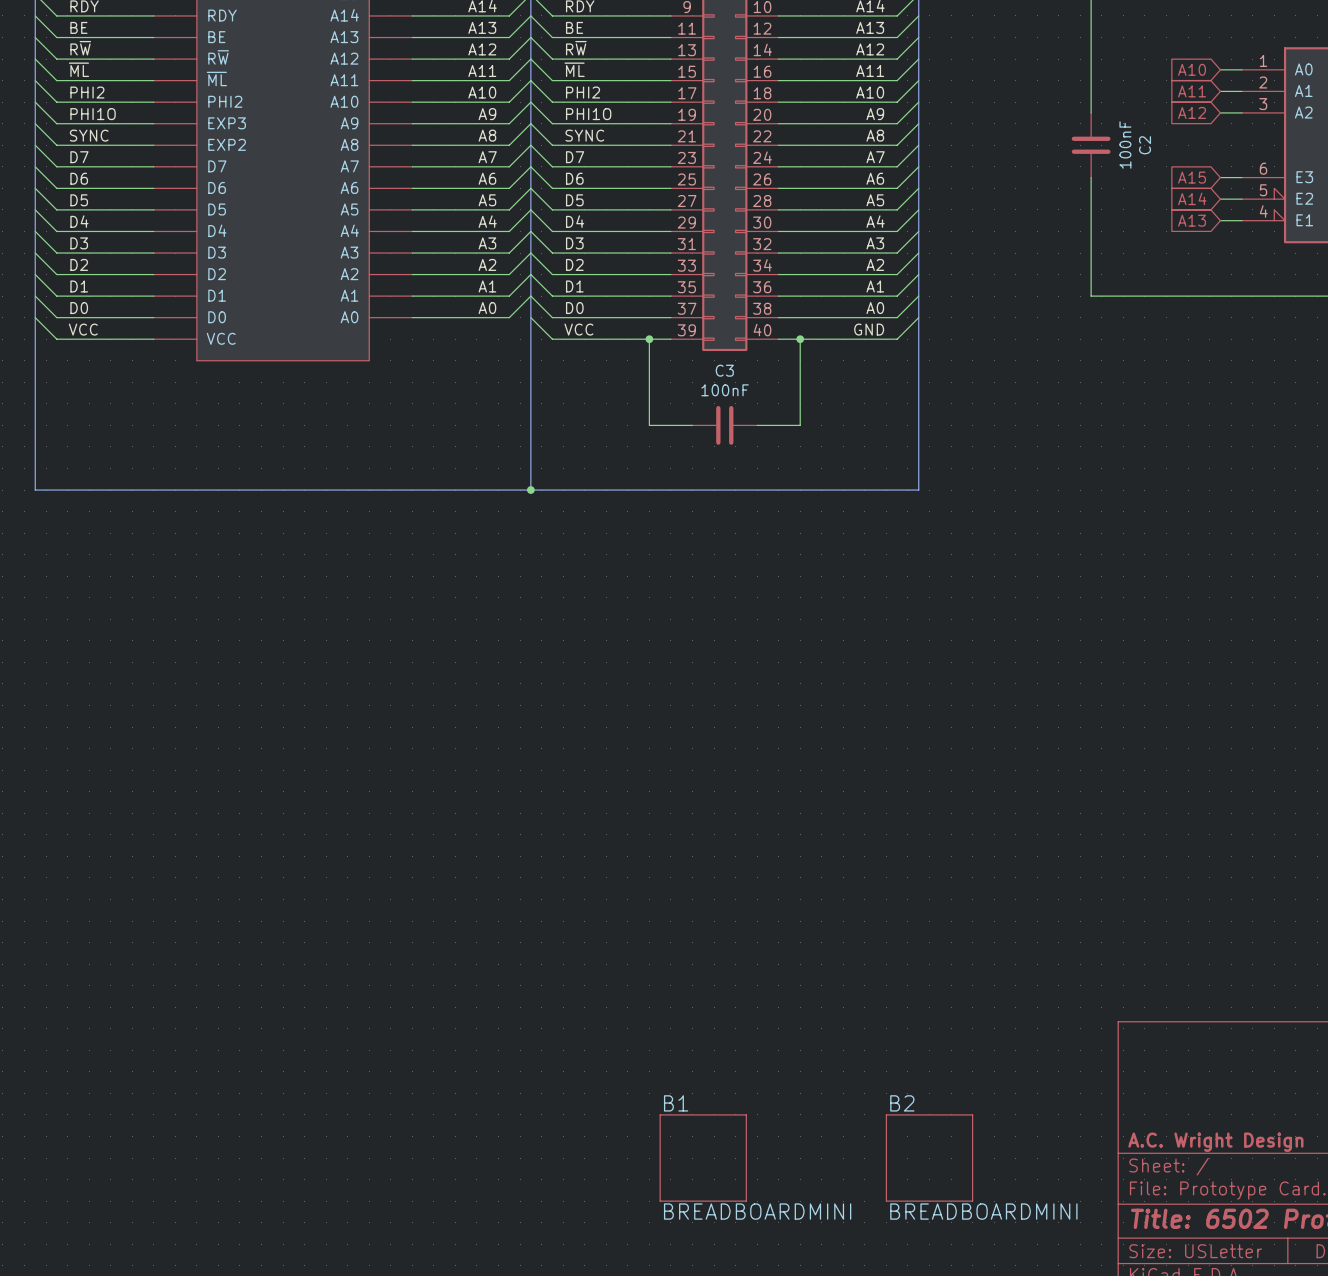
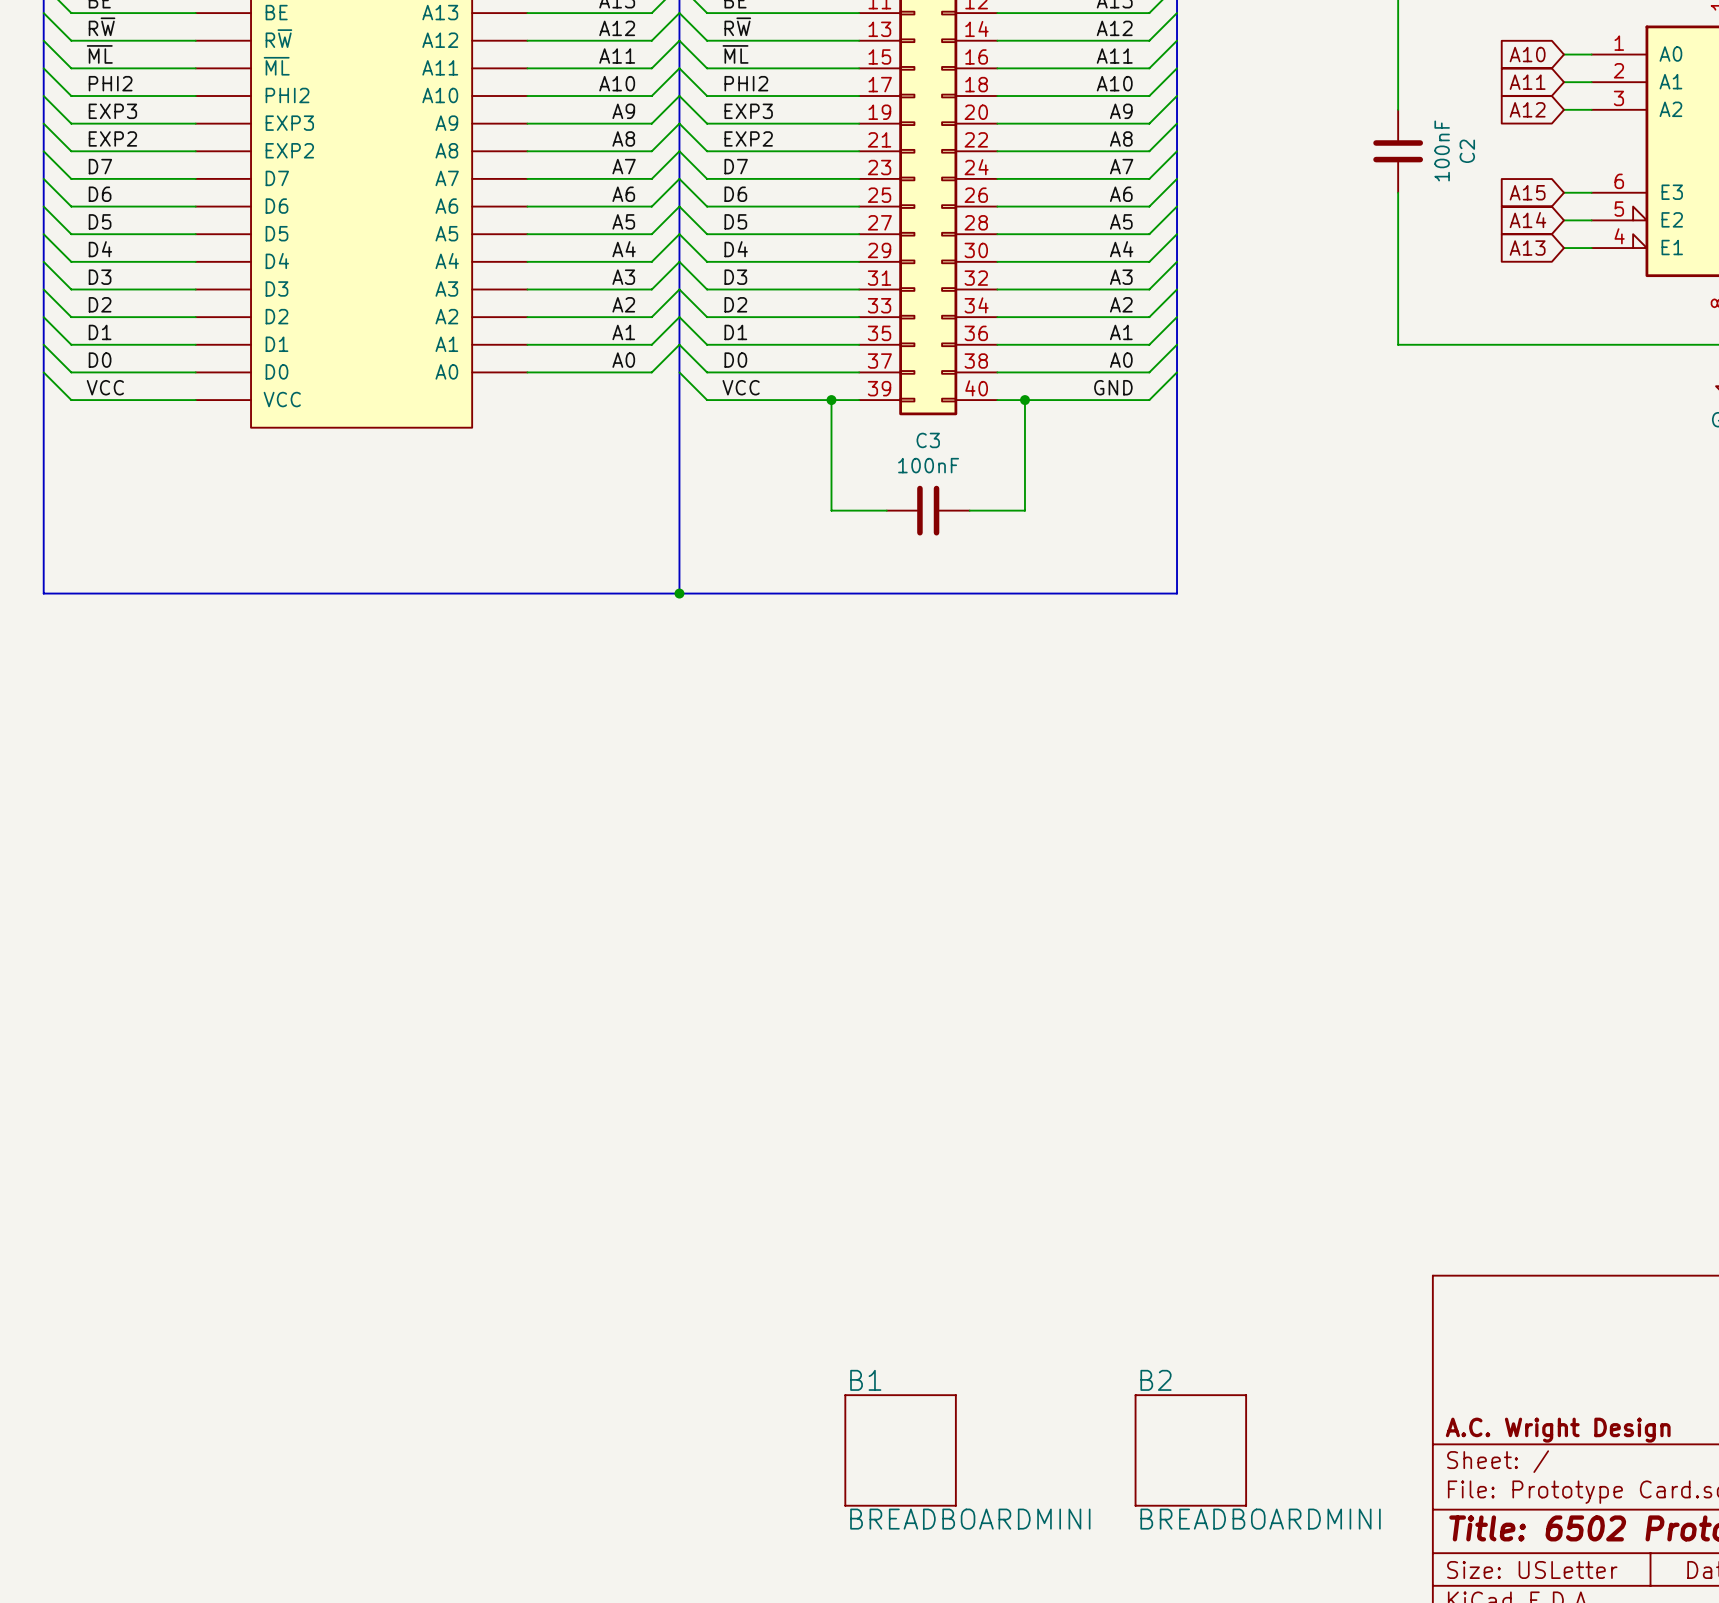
label: PHI1O (93, 114) -> EXP3 (112, 111)
label: PHI1O (588, 114) -> EXP3 (748, 111)
label: SYNC (89, 135) -> EXP2 (112, 138)
label: SYNC (584, 135) -> EXP2 (748, 138)

